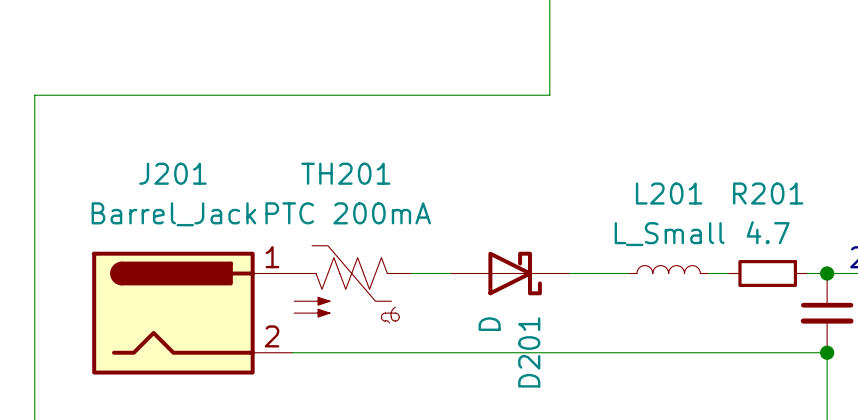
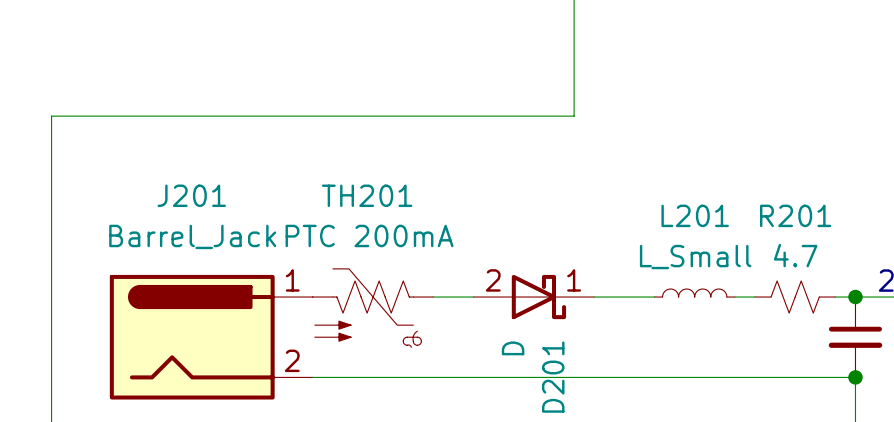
D201 pin number: none -> 2 (493, 280)
D201 pin number: none -> 1 (574, 280)
R201 symbol: [728, 260, 808, 287] -> [754, 280, 836, 314]

